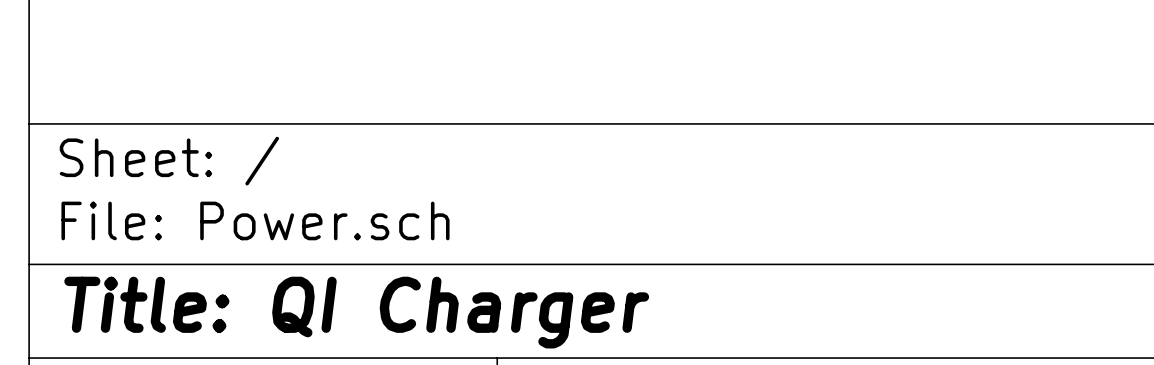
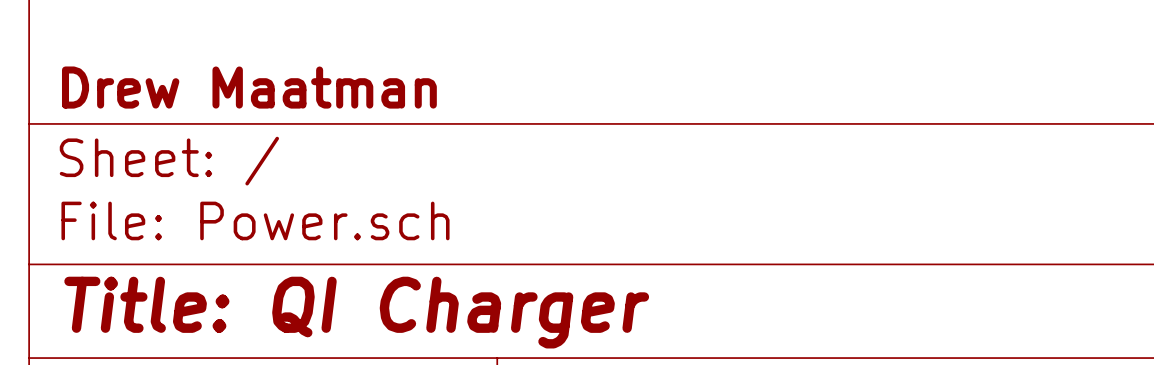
title block: none -> Drew Maatman (249, 87)

